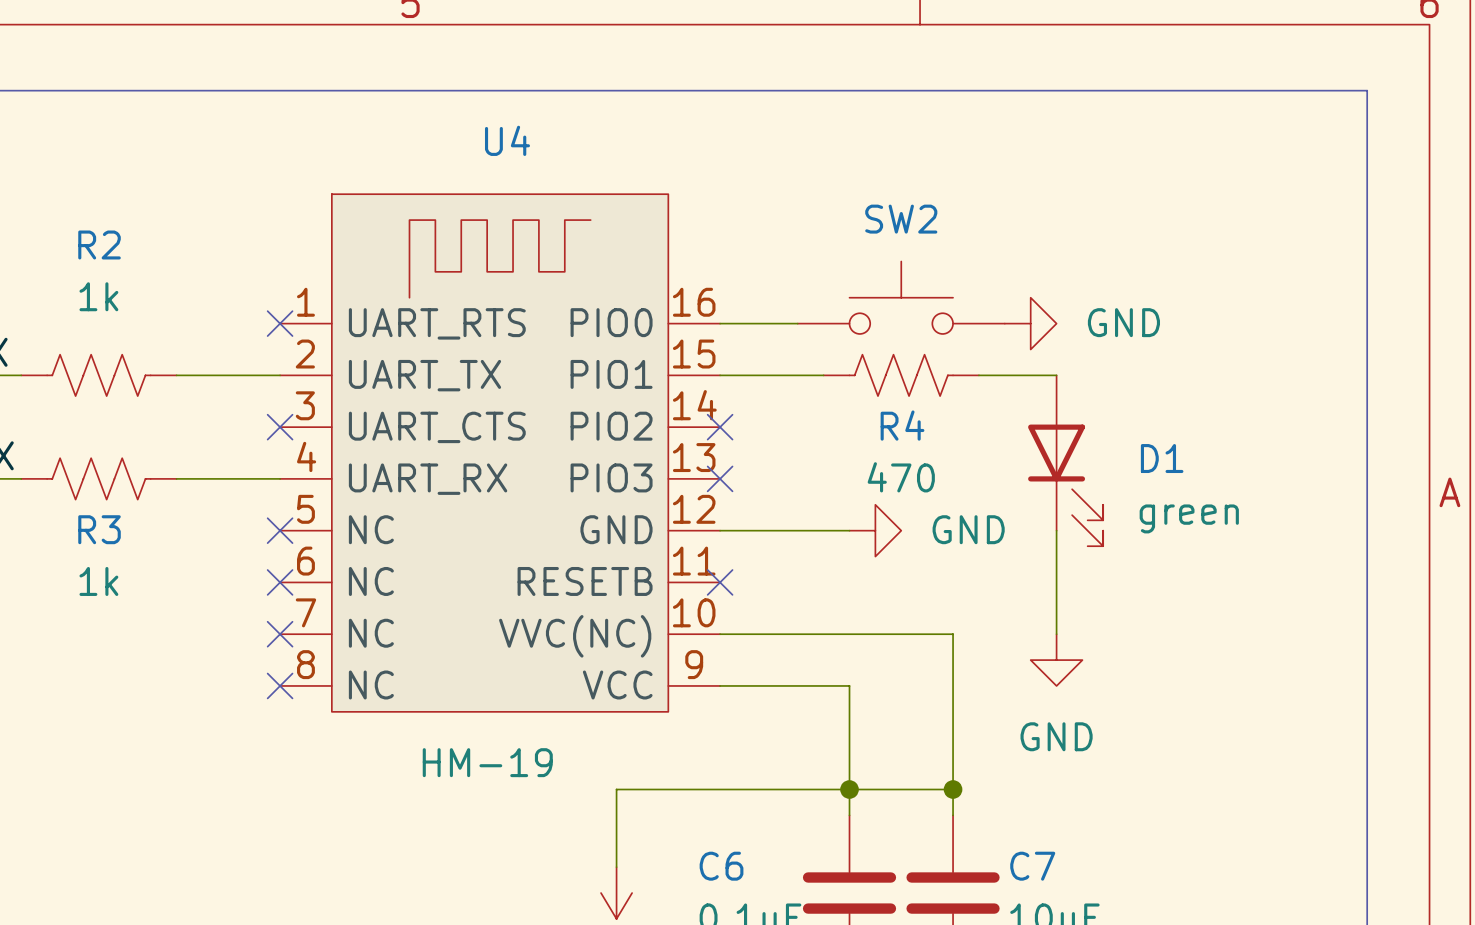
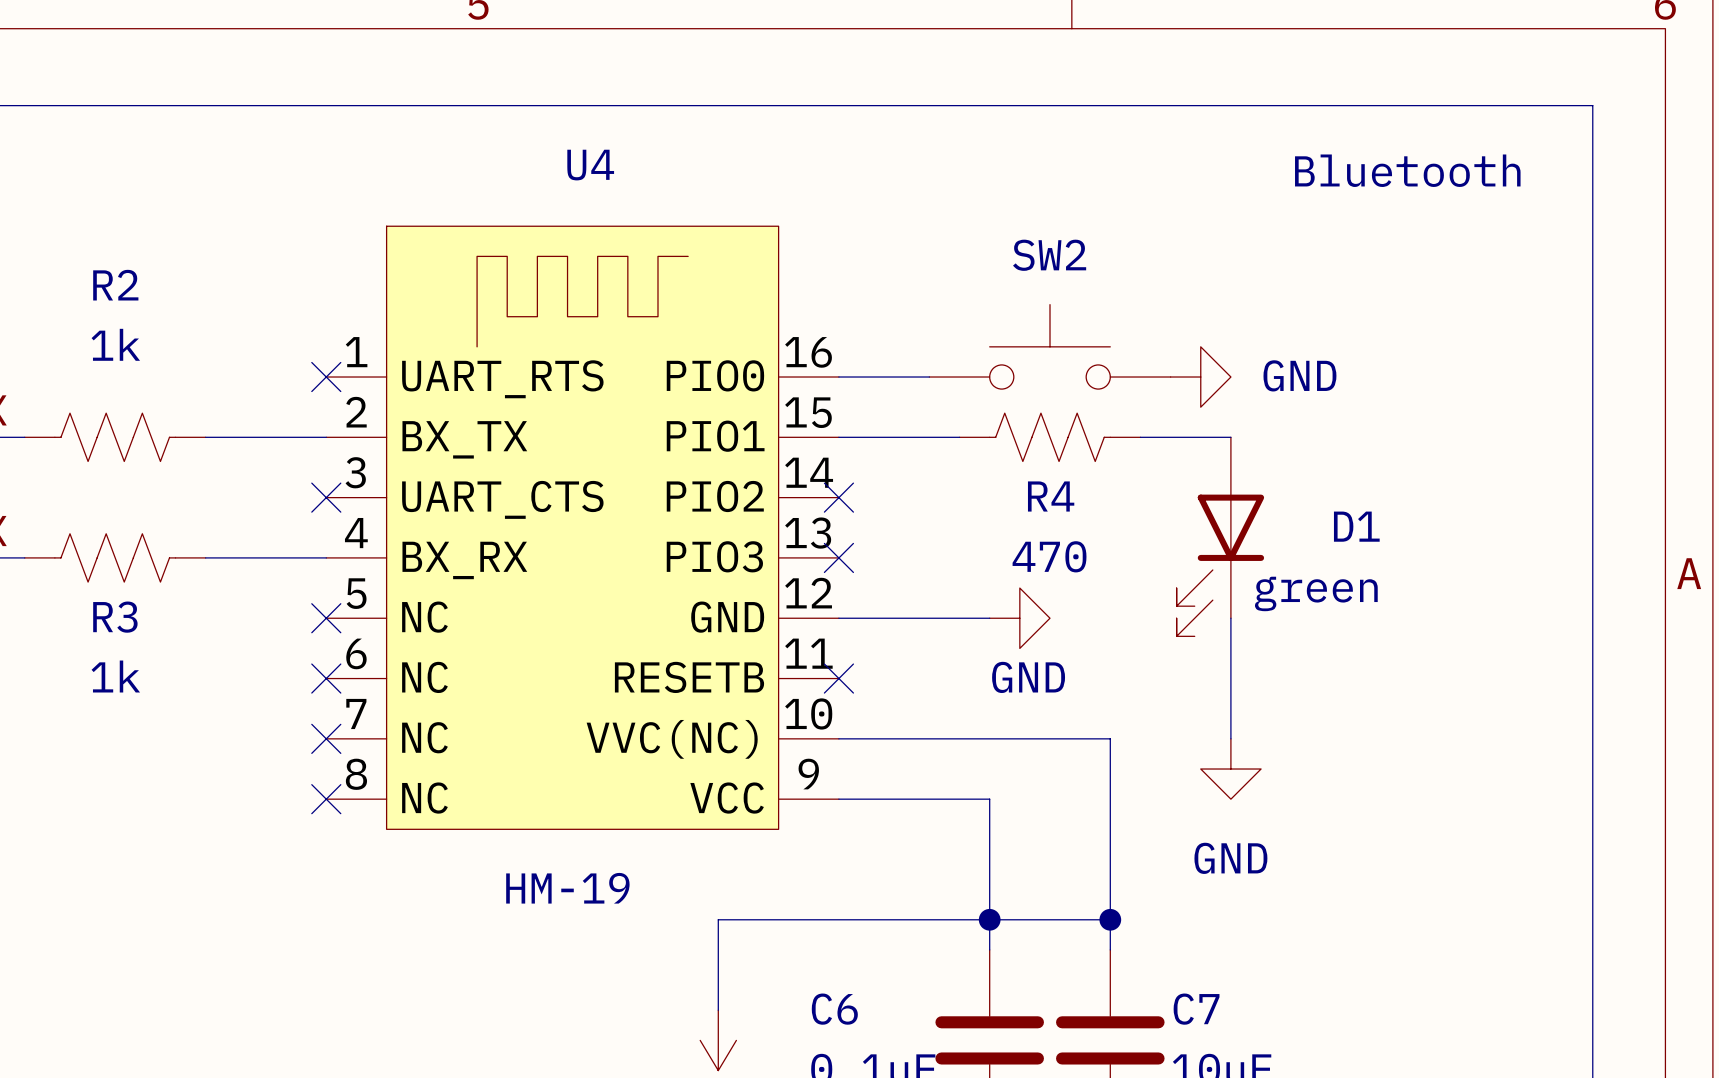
text: none -> Bluetooth (1407, 170)
U4 pin name: UART_TX (424, 375) -> BX_TX (464, 439)
U4 pin name: UART_RX (428, 479) -> BX_RX (464, 560)
D1 flip: as is (1065, 485) -> left-right (1220, 565)
D1 value position: green (1189, 518) -> green (1316, 593)
power symbol text position: GND (968, 529) -> GND (1028, 677)

